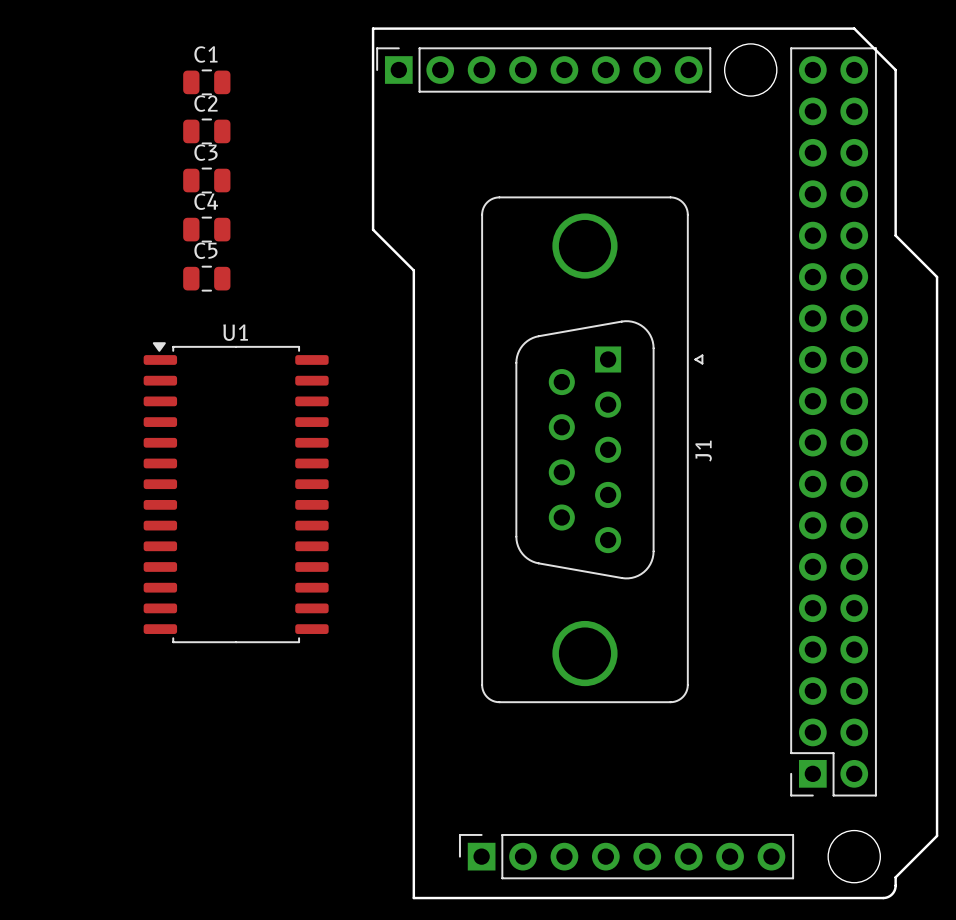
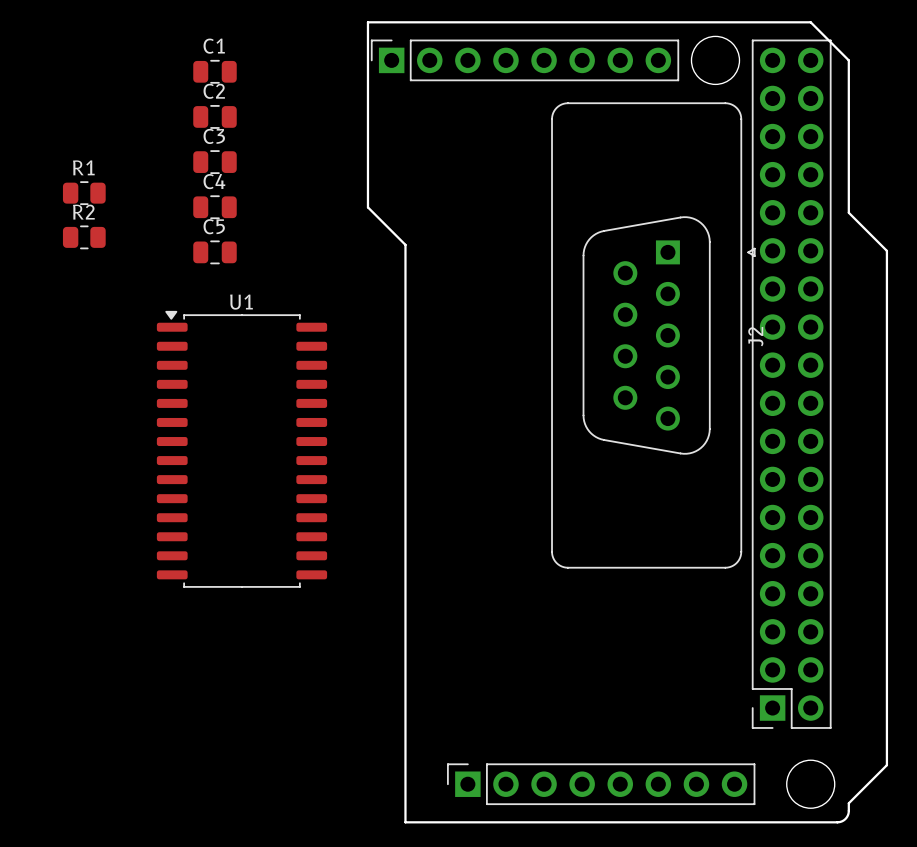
R1: none -> (84, 193)
R2: none -> (84, 237)
J2: none -> (653, 335)
J1: (592, 449) -> none

